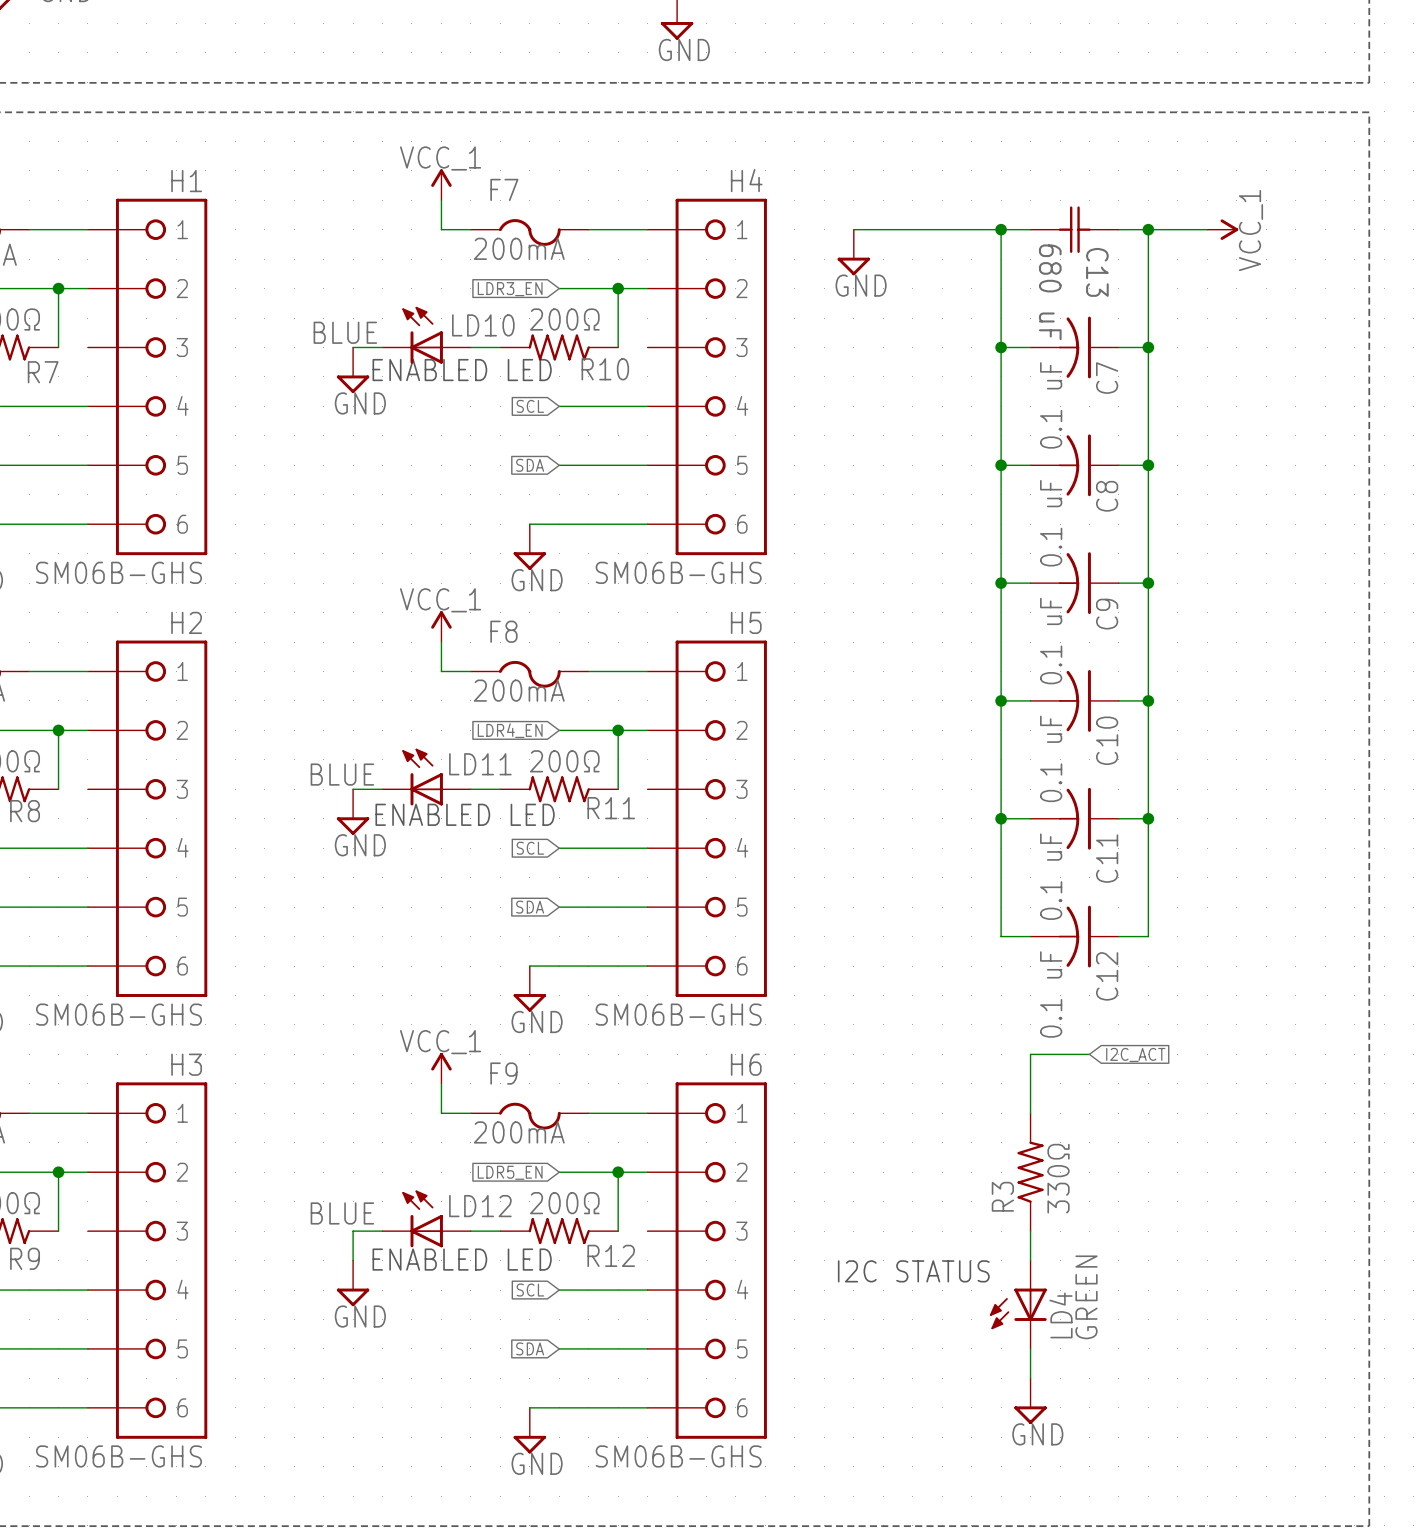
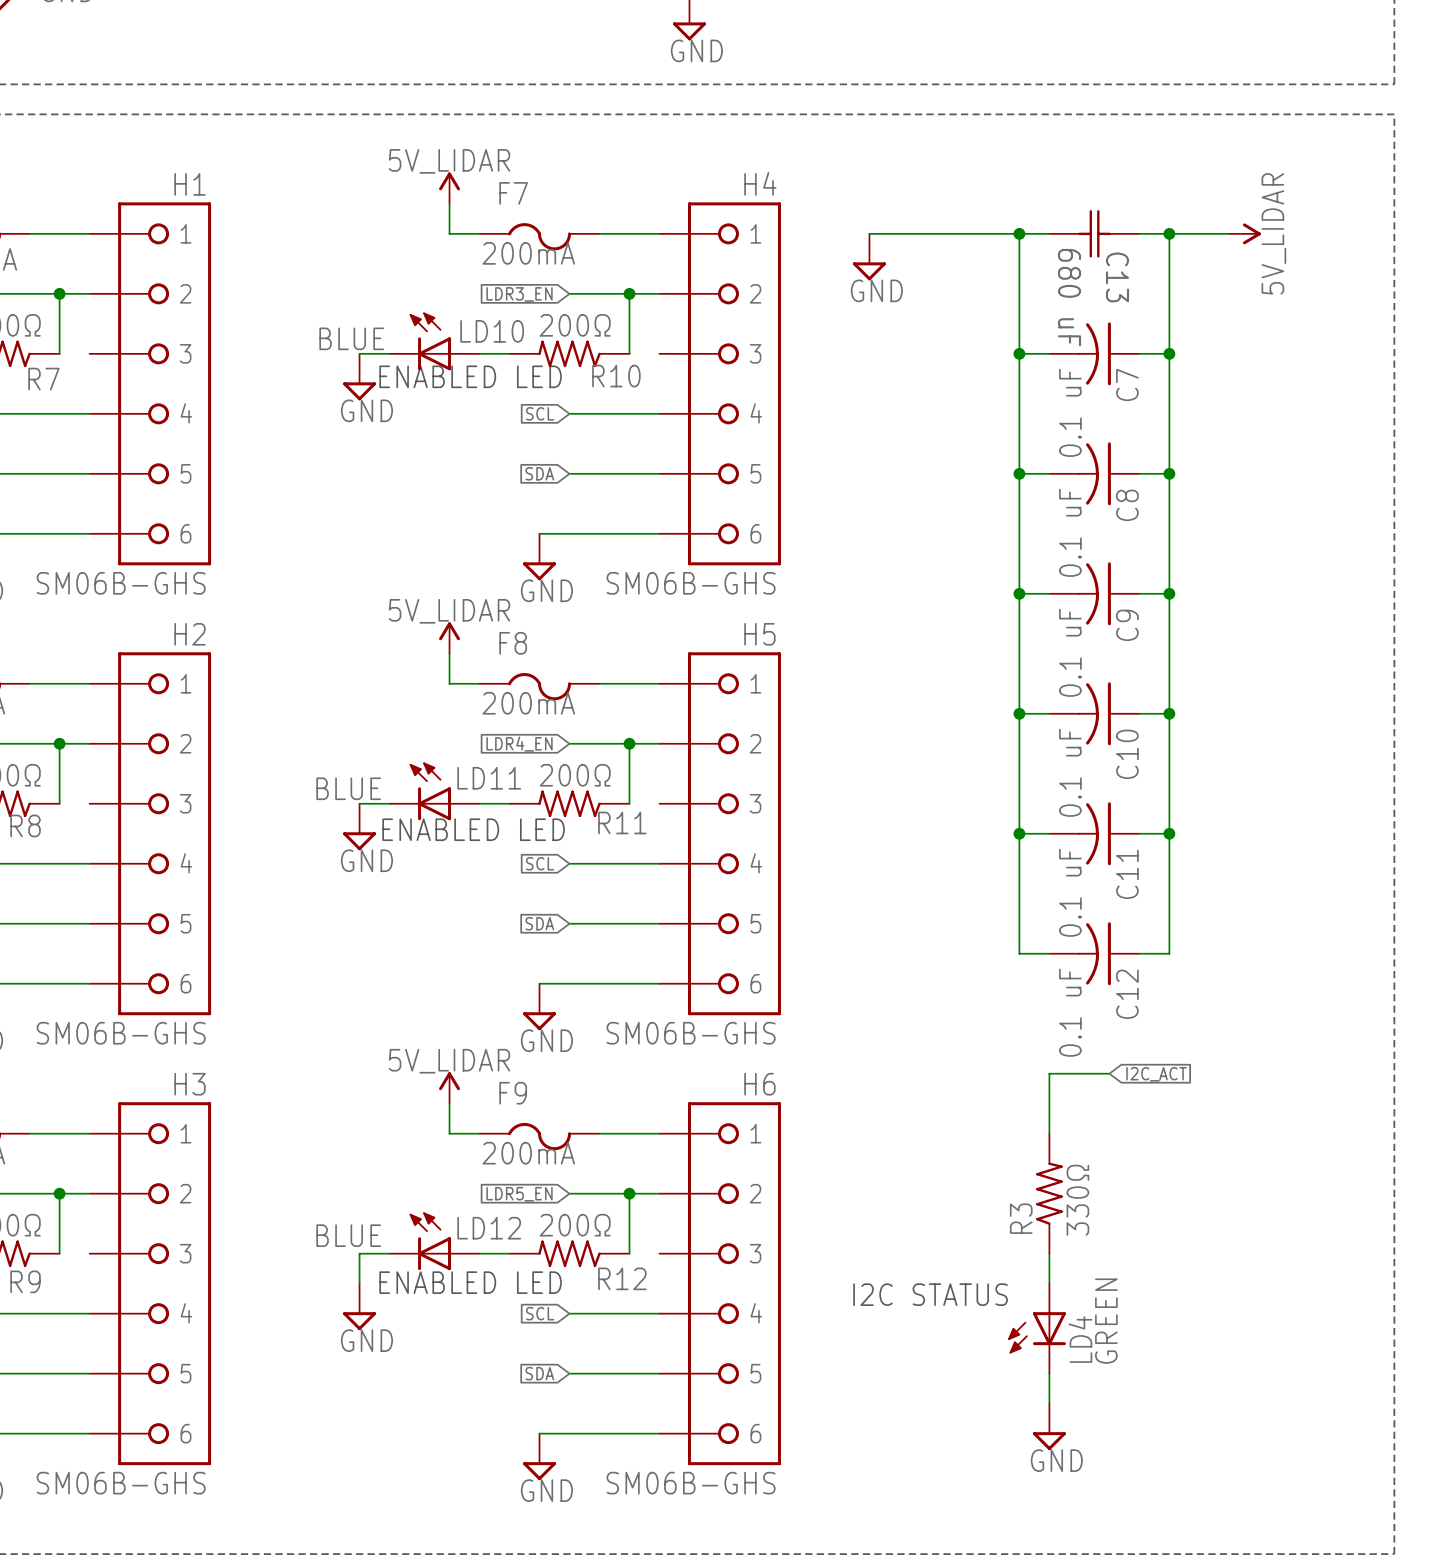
power symbol: VCC_1 (441, 184) -> 5V_LIDAR (449, 188)
power symbol: VCC_1 (1222, 229) -> 5V_LIDAR (1245, 233)
power symbol: VCC_1 (441, 626) -> 5V_LIDAR (449, 638)
power symbol: VCC_1 (441, 1068) -> 5V_LIDAR (449, 1087)

